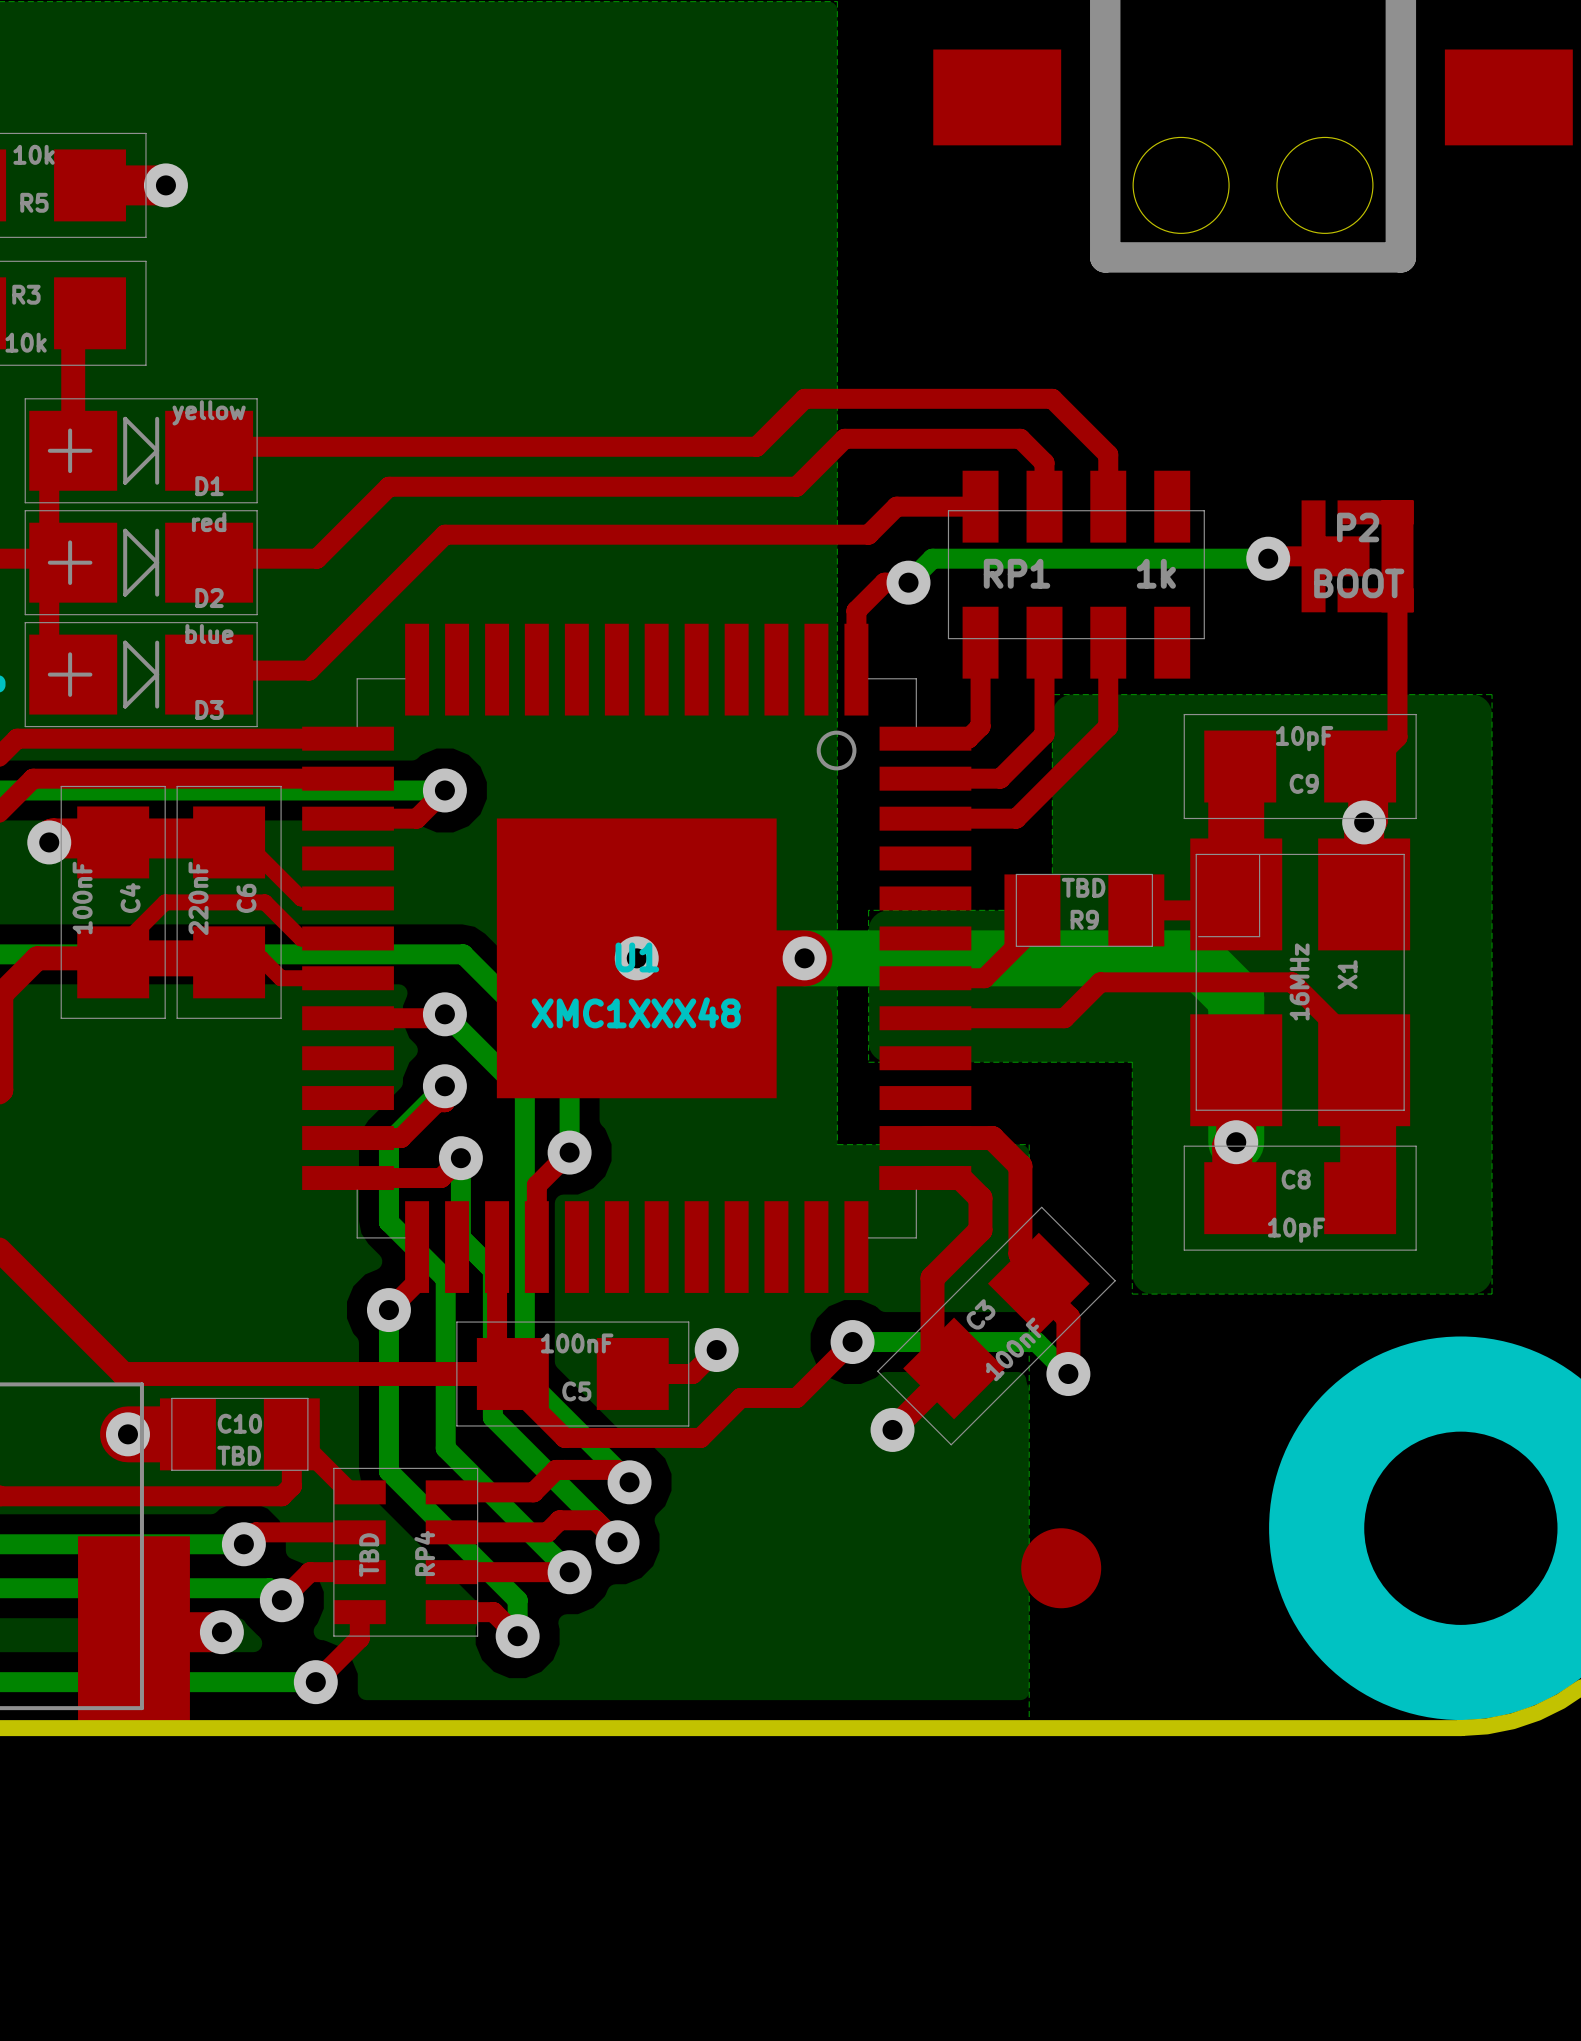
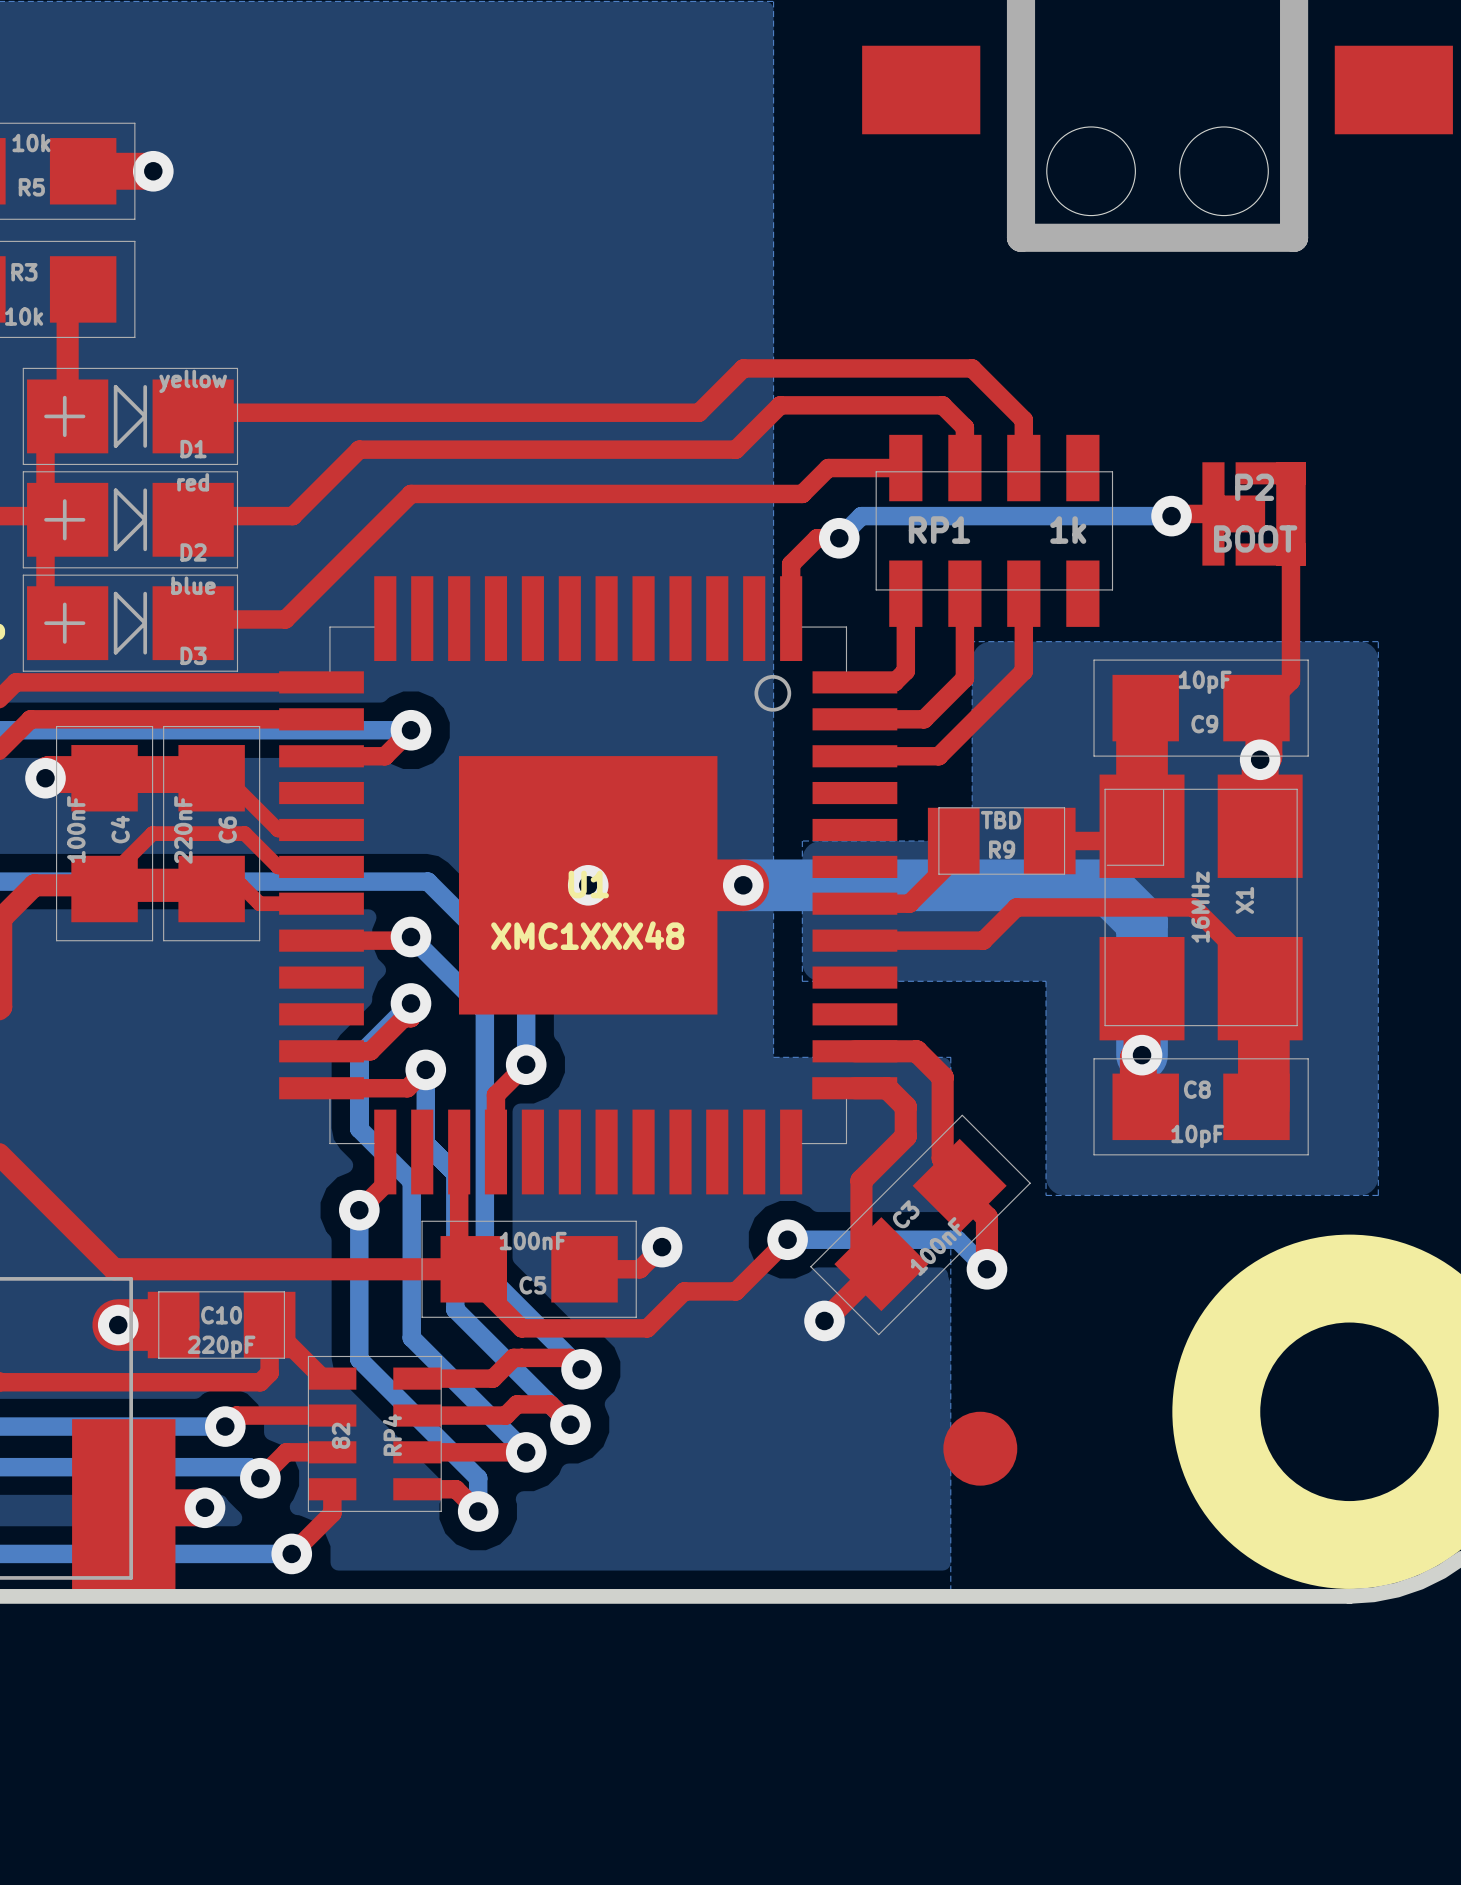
C10 value: TBD (239, 1455) -> 220pF (221, 1347)
RP4 value: TBD (369, 1555) -> 82 (341, 1435)

